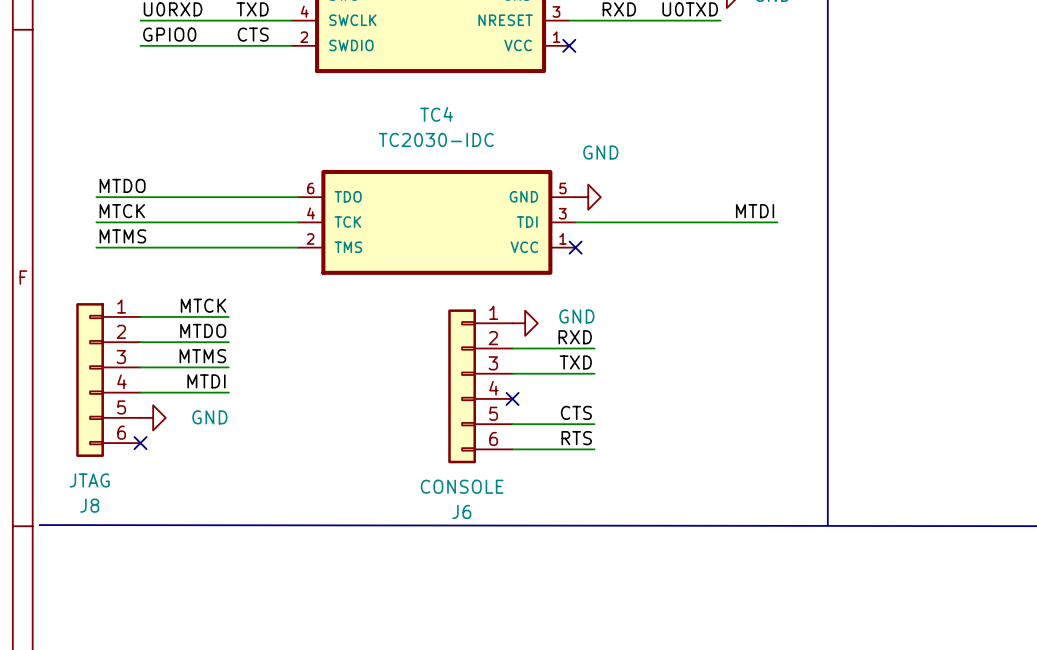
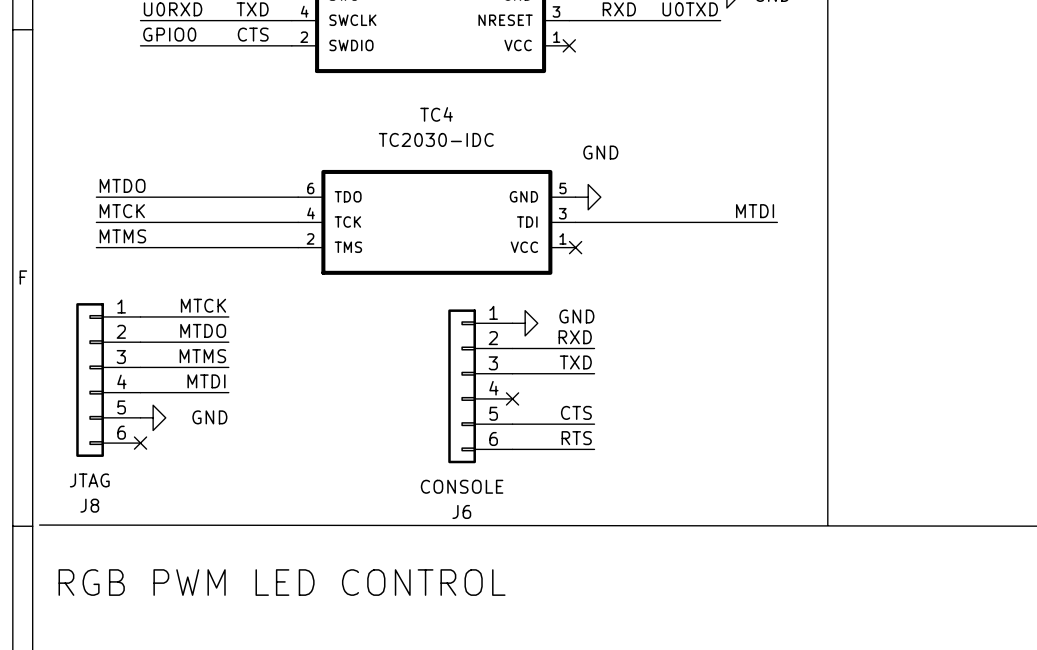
text: none -> RGB PWM LED CONTROL (282, 582)

